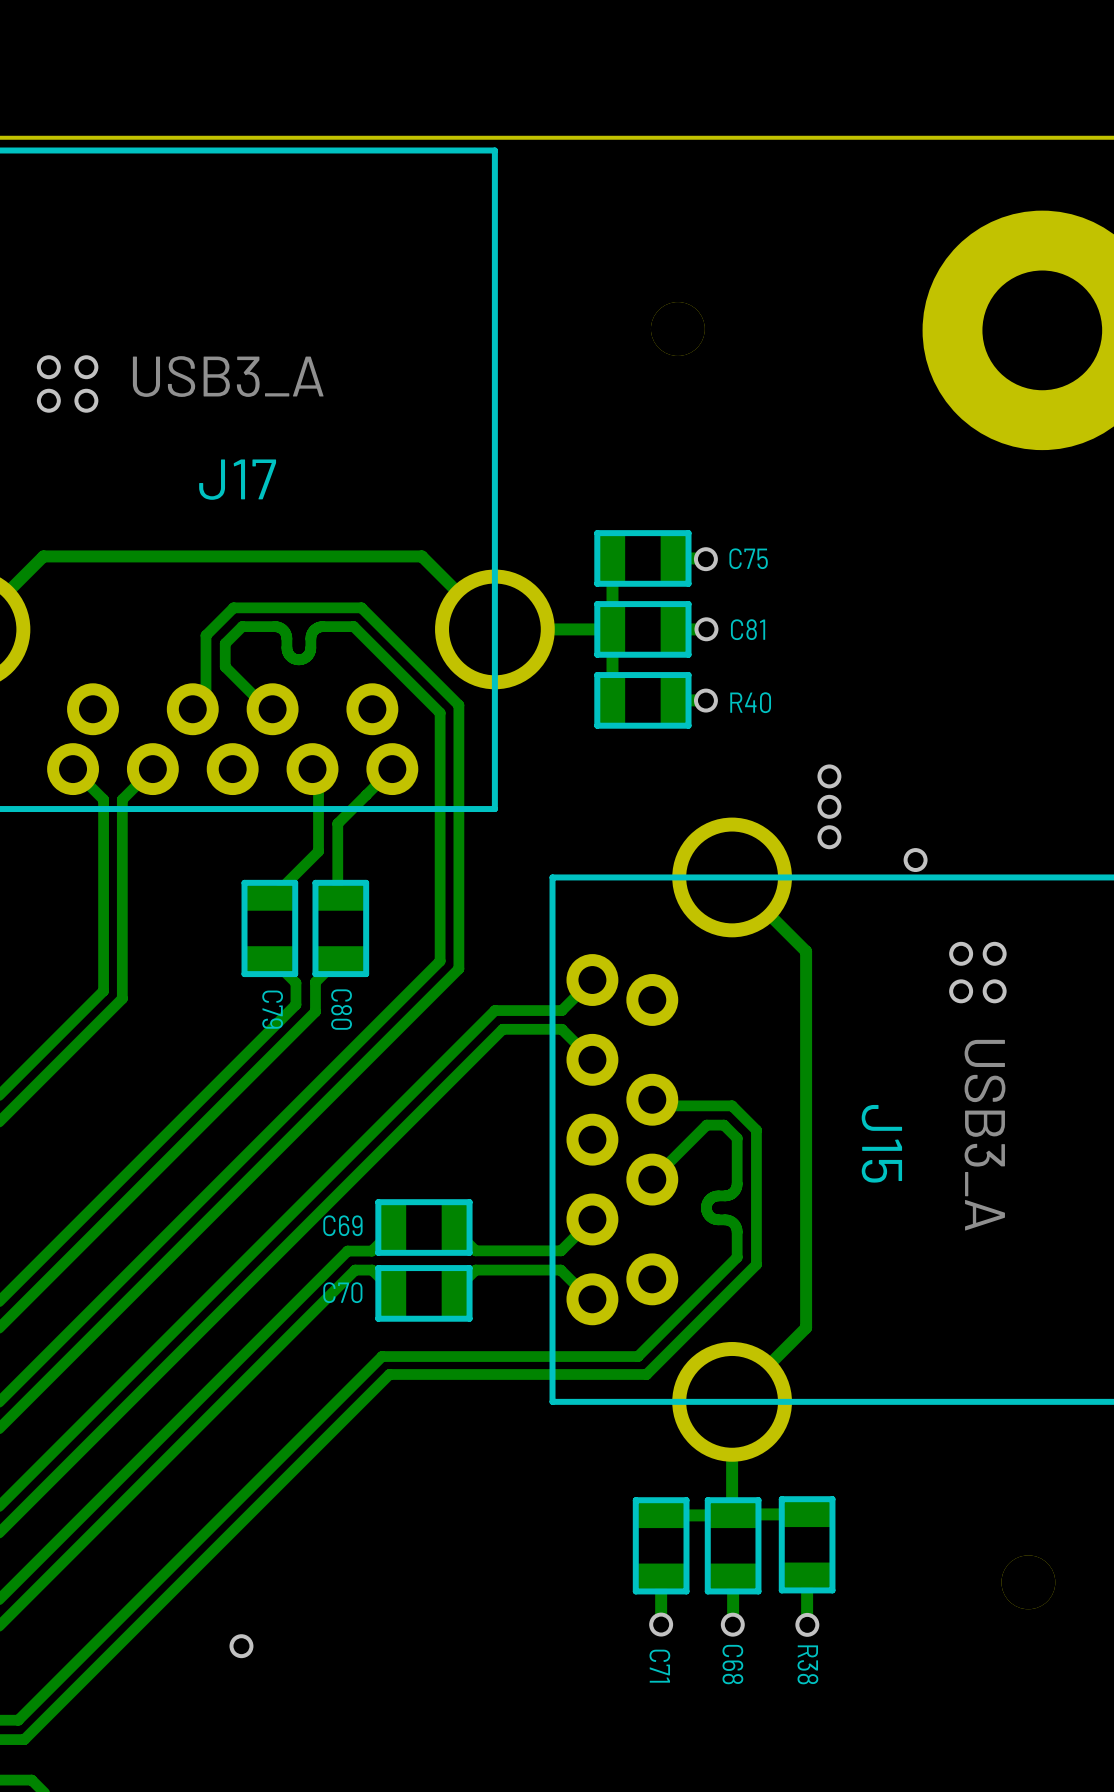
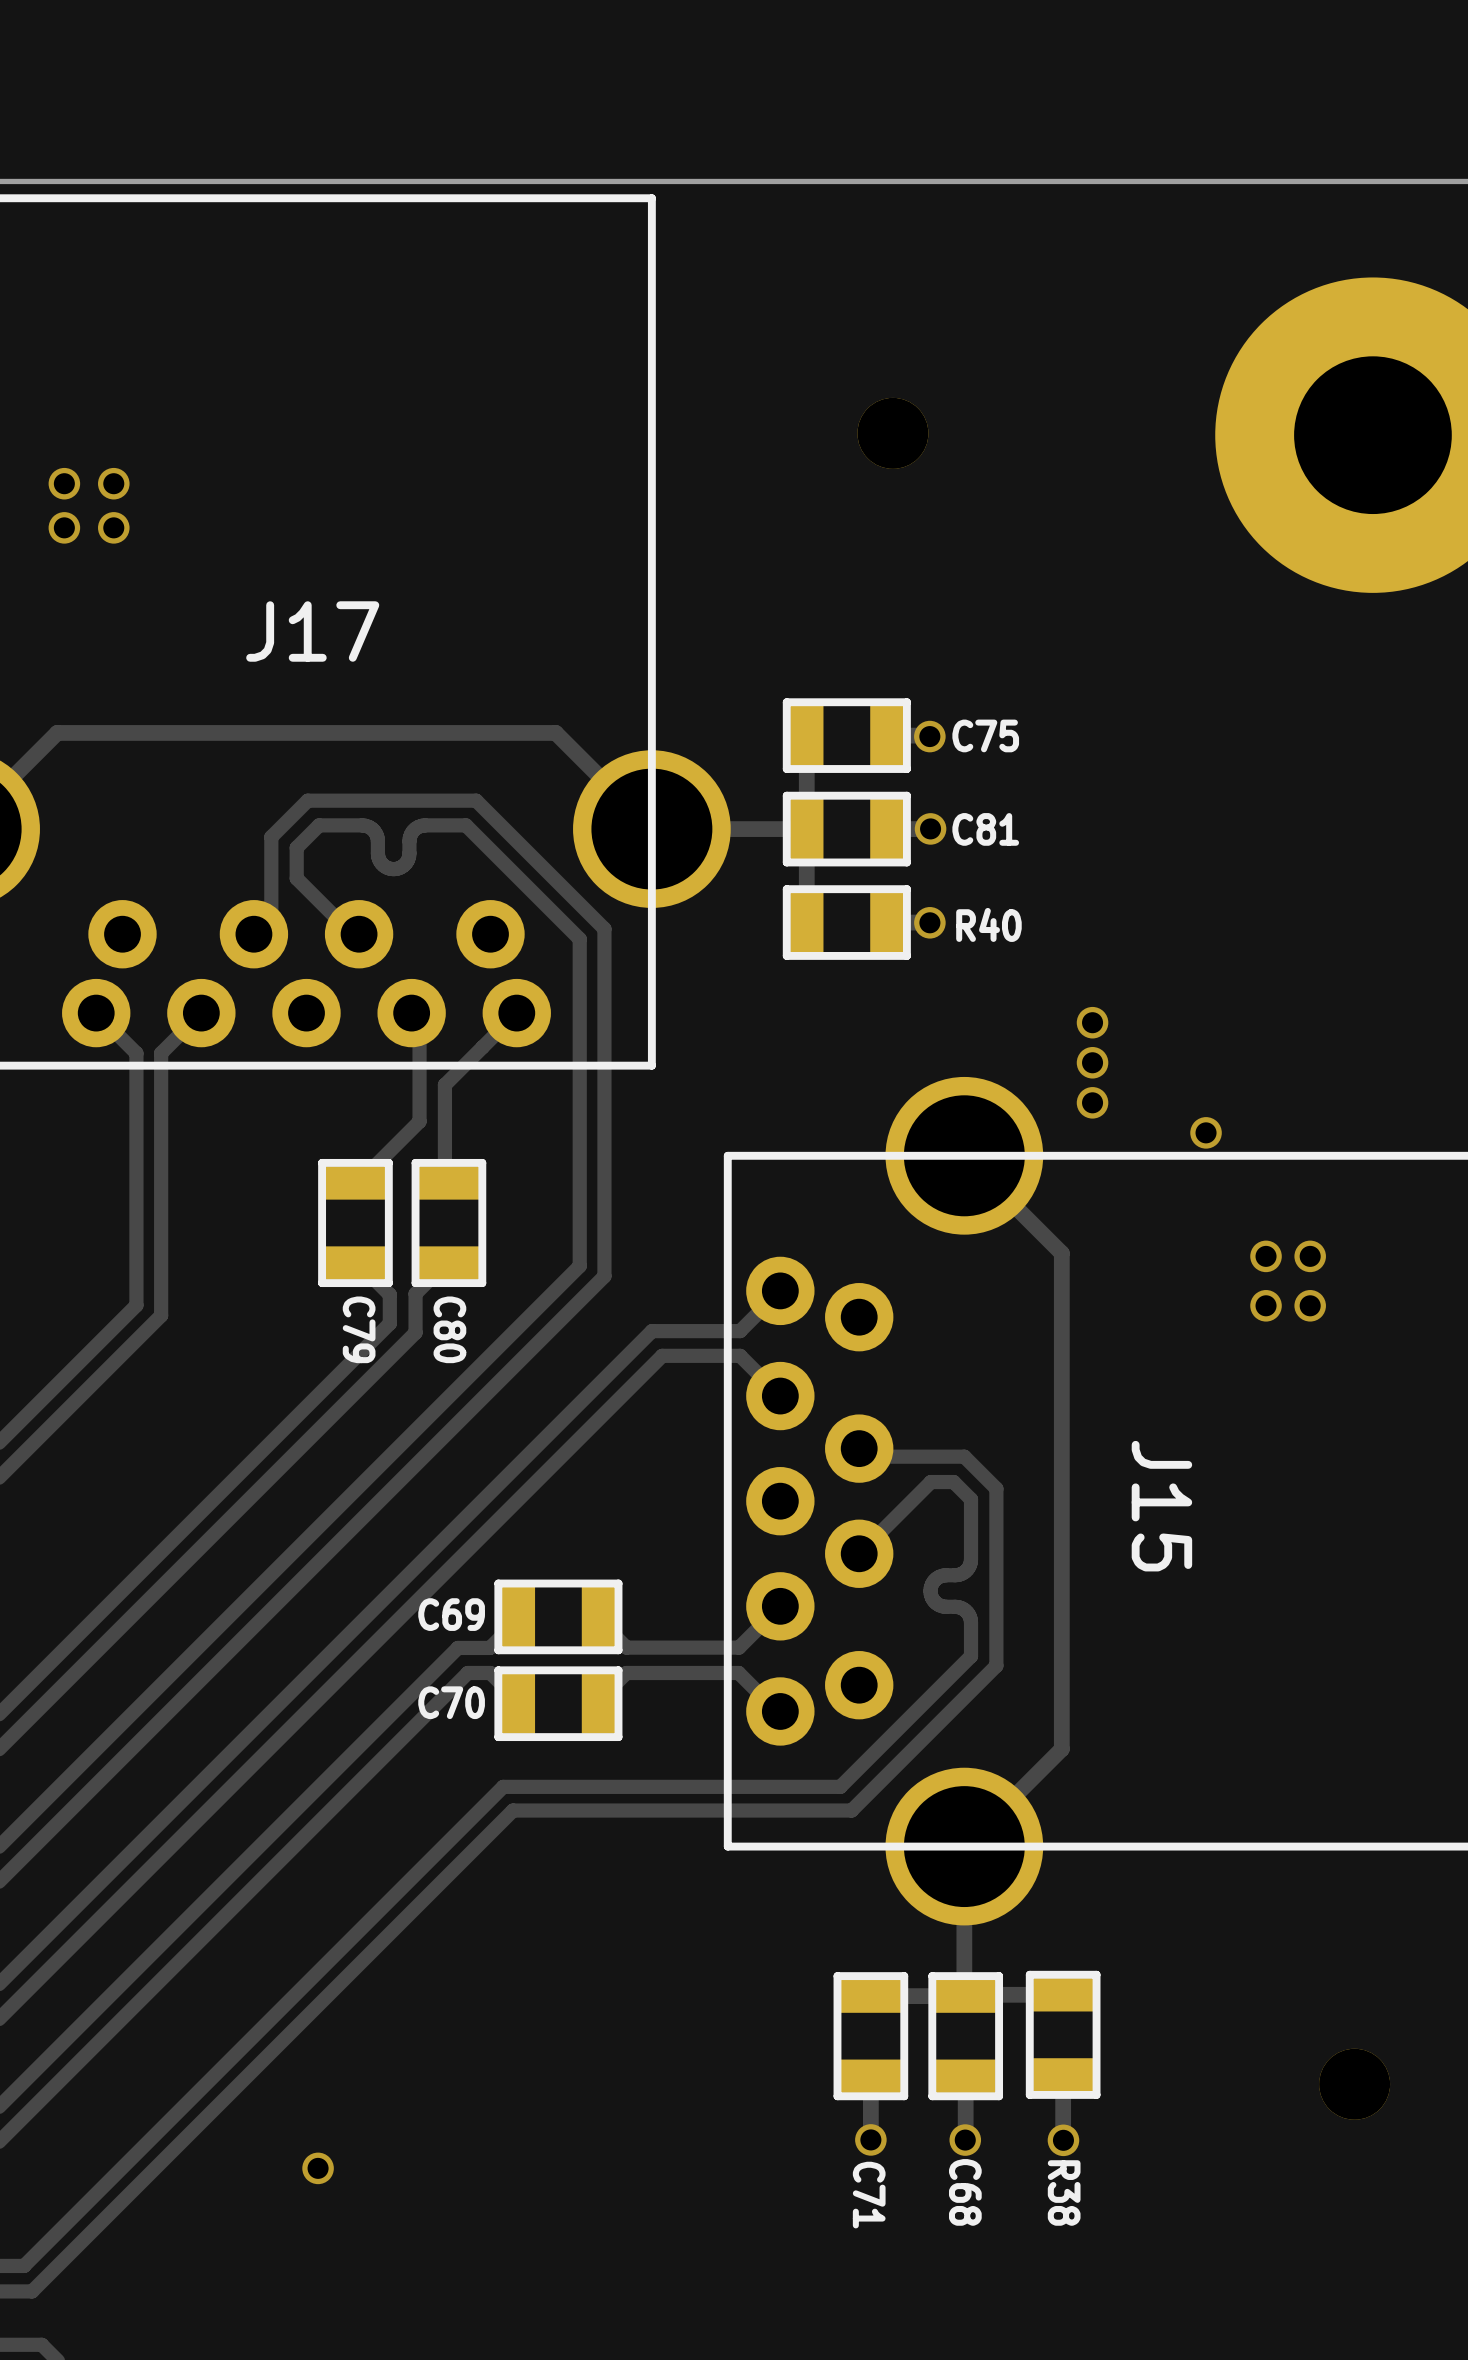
J17 value: USB3_A (228, 376) -> none
J15 value: USB3_A (985, 1135) -> none

